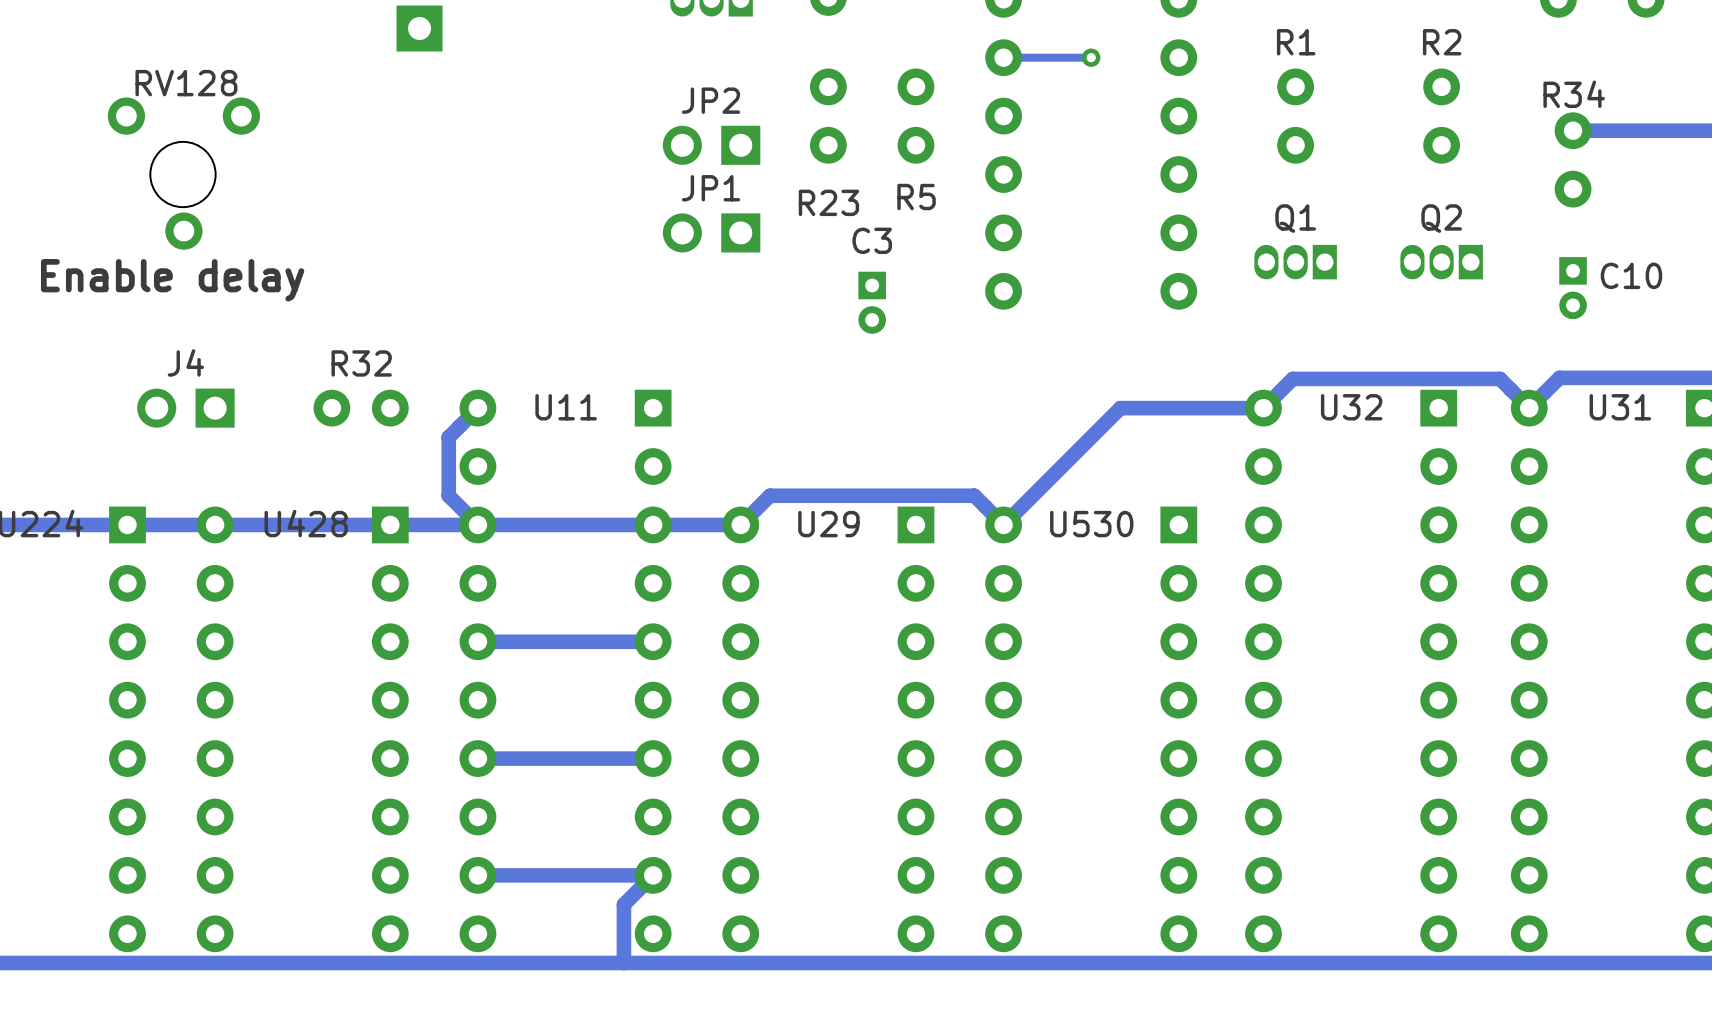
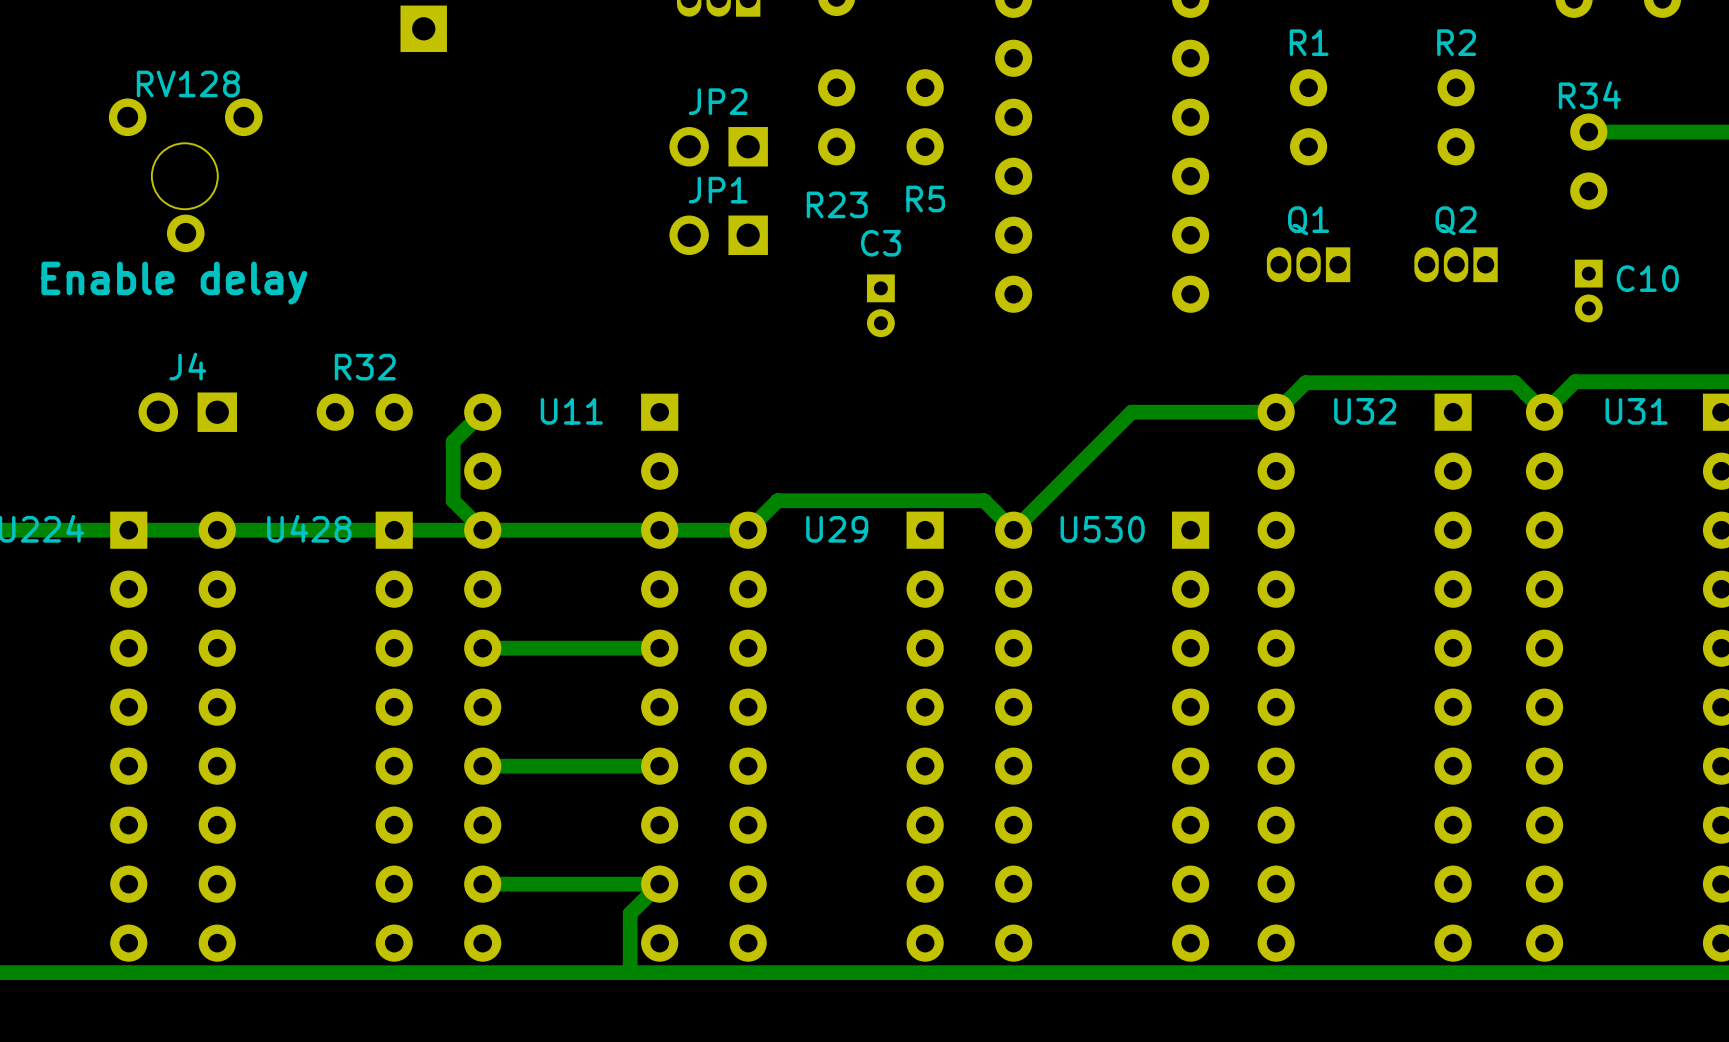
track: (1091, 57) (1003, 57) -> none
via: (1091, 57) -> none

